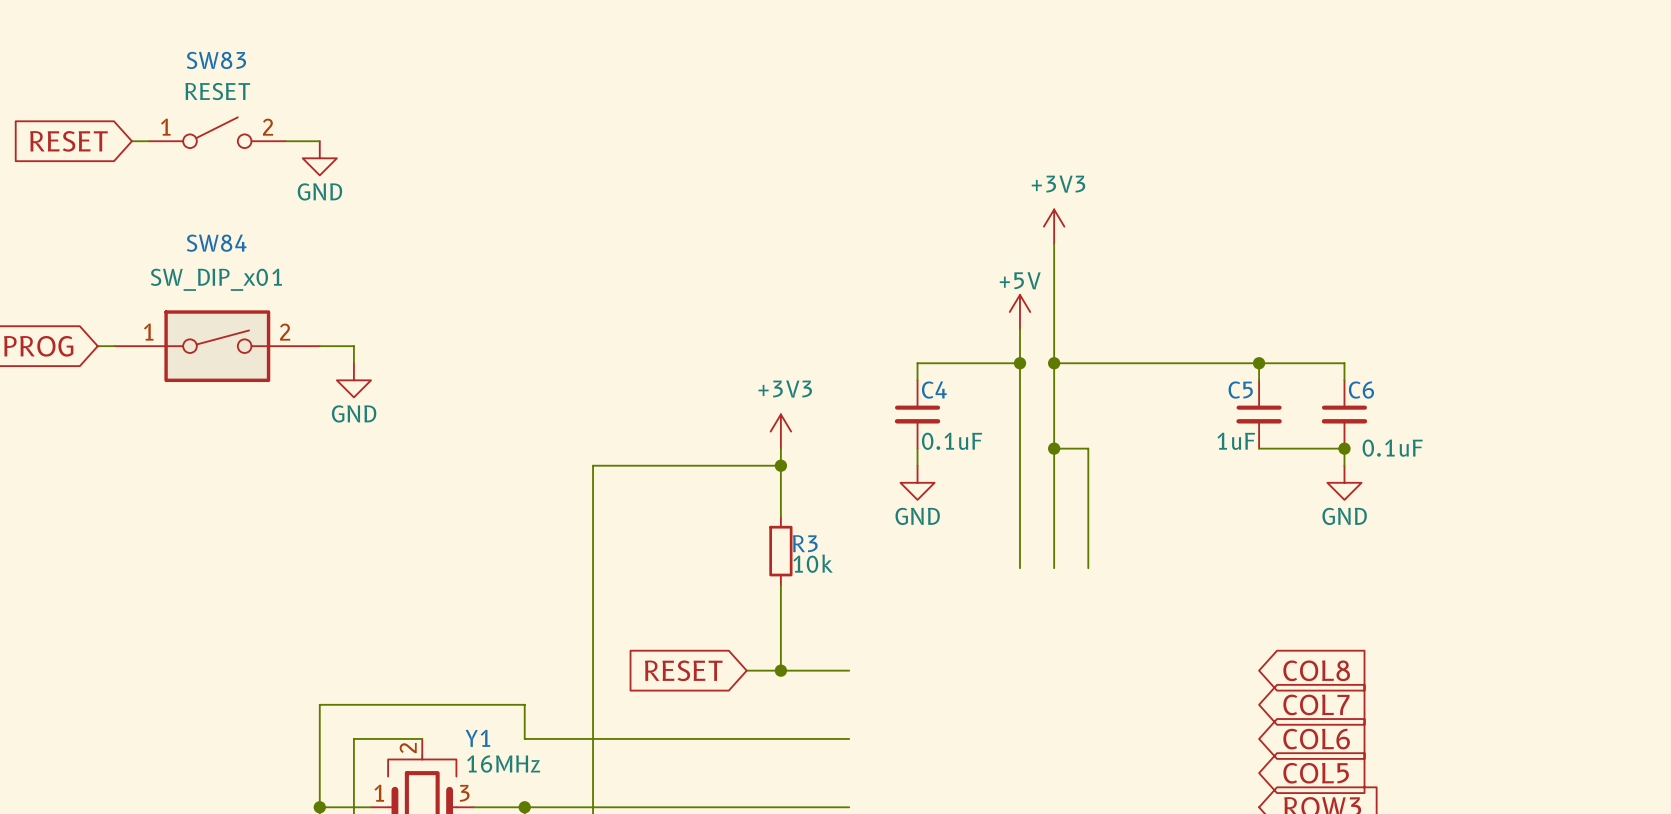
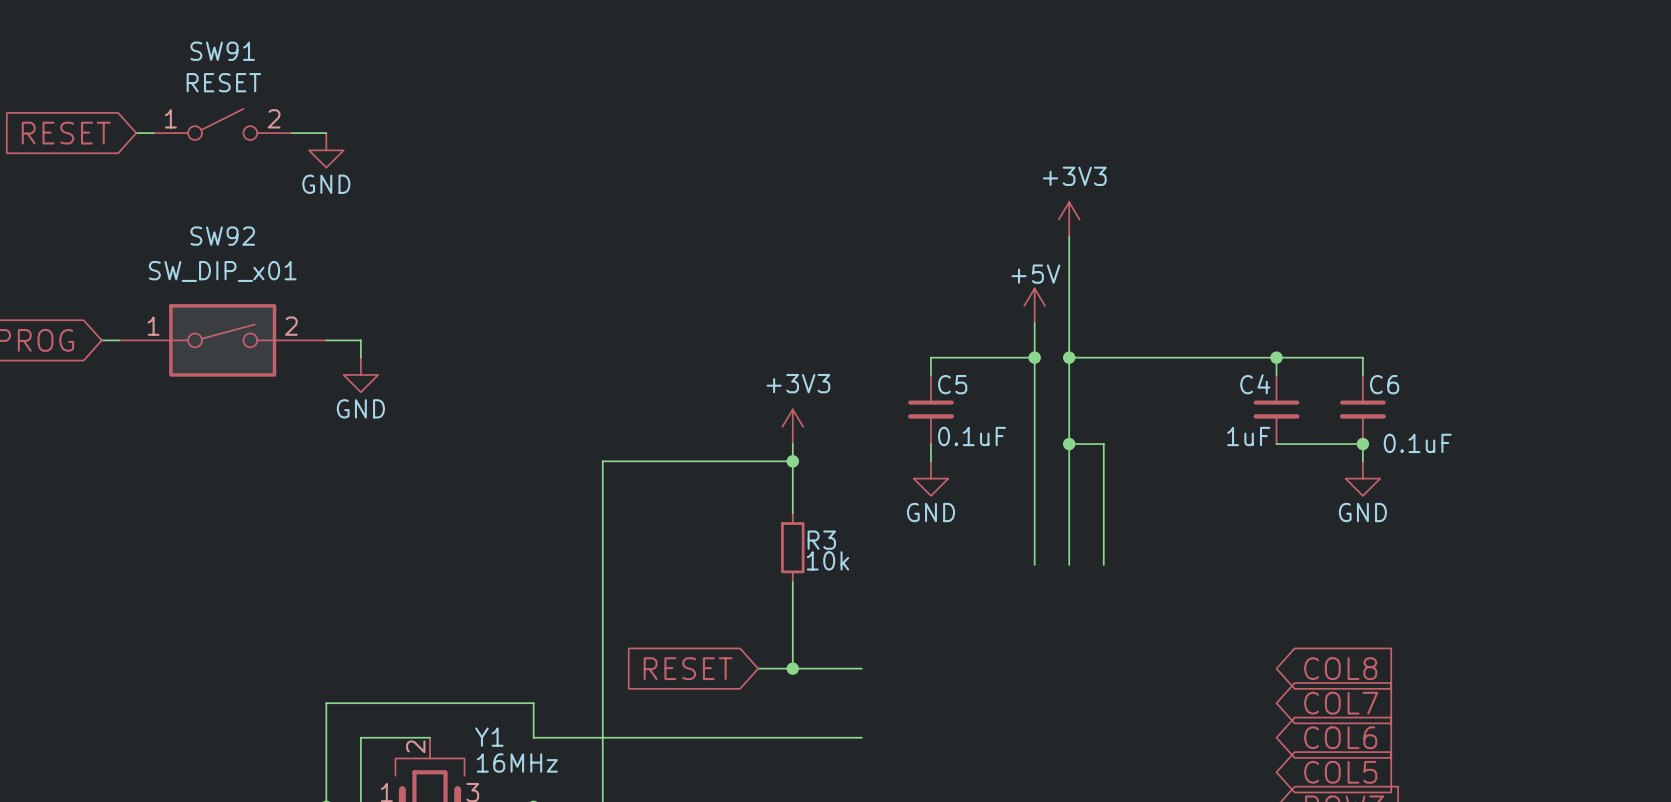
SW83 name: SW83 (216, 60) -> SW91 (222, 51)
SW84 name: SW84 (216, 243) -> SW92 (222, 236)
C4 name: C4 (934, 390) -> C5 (952, 384)
C5 name: C5 (1240, 390) -> C4 (1255, 384)

